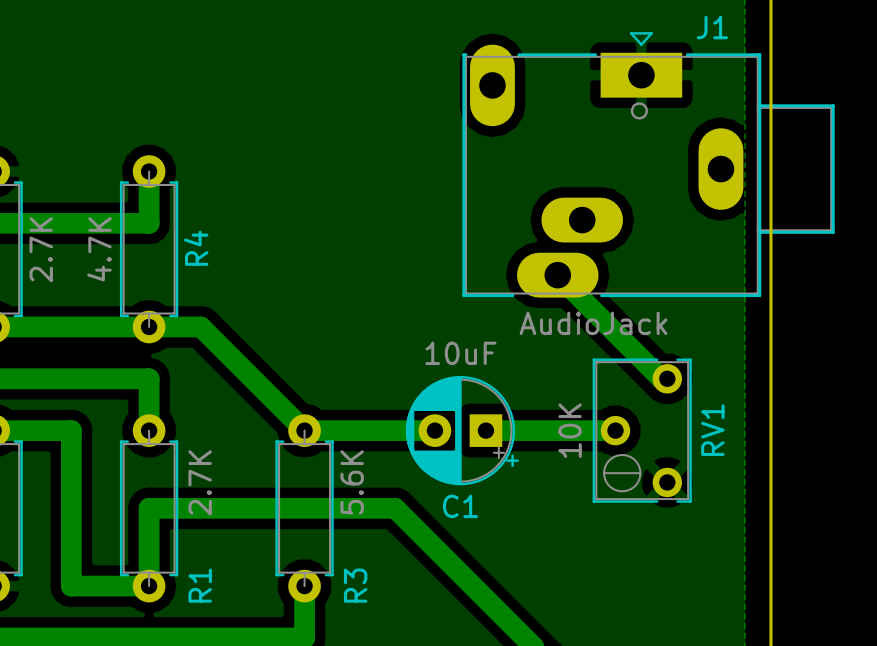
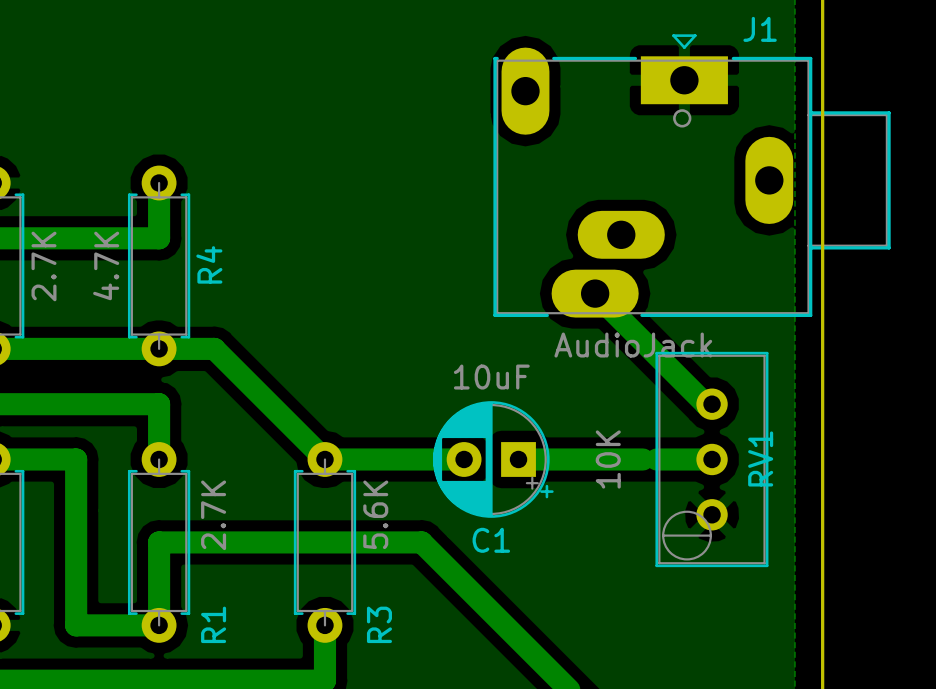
RV1 footprint: [592, 358, 692, 503] -> [655, 351, 769, 568]
bottom track: none -> (656, 459) (712, 459)

